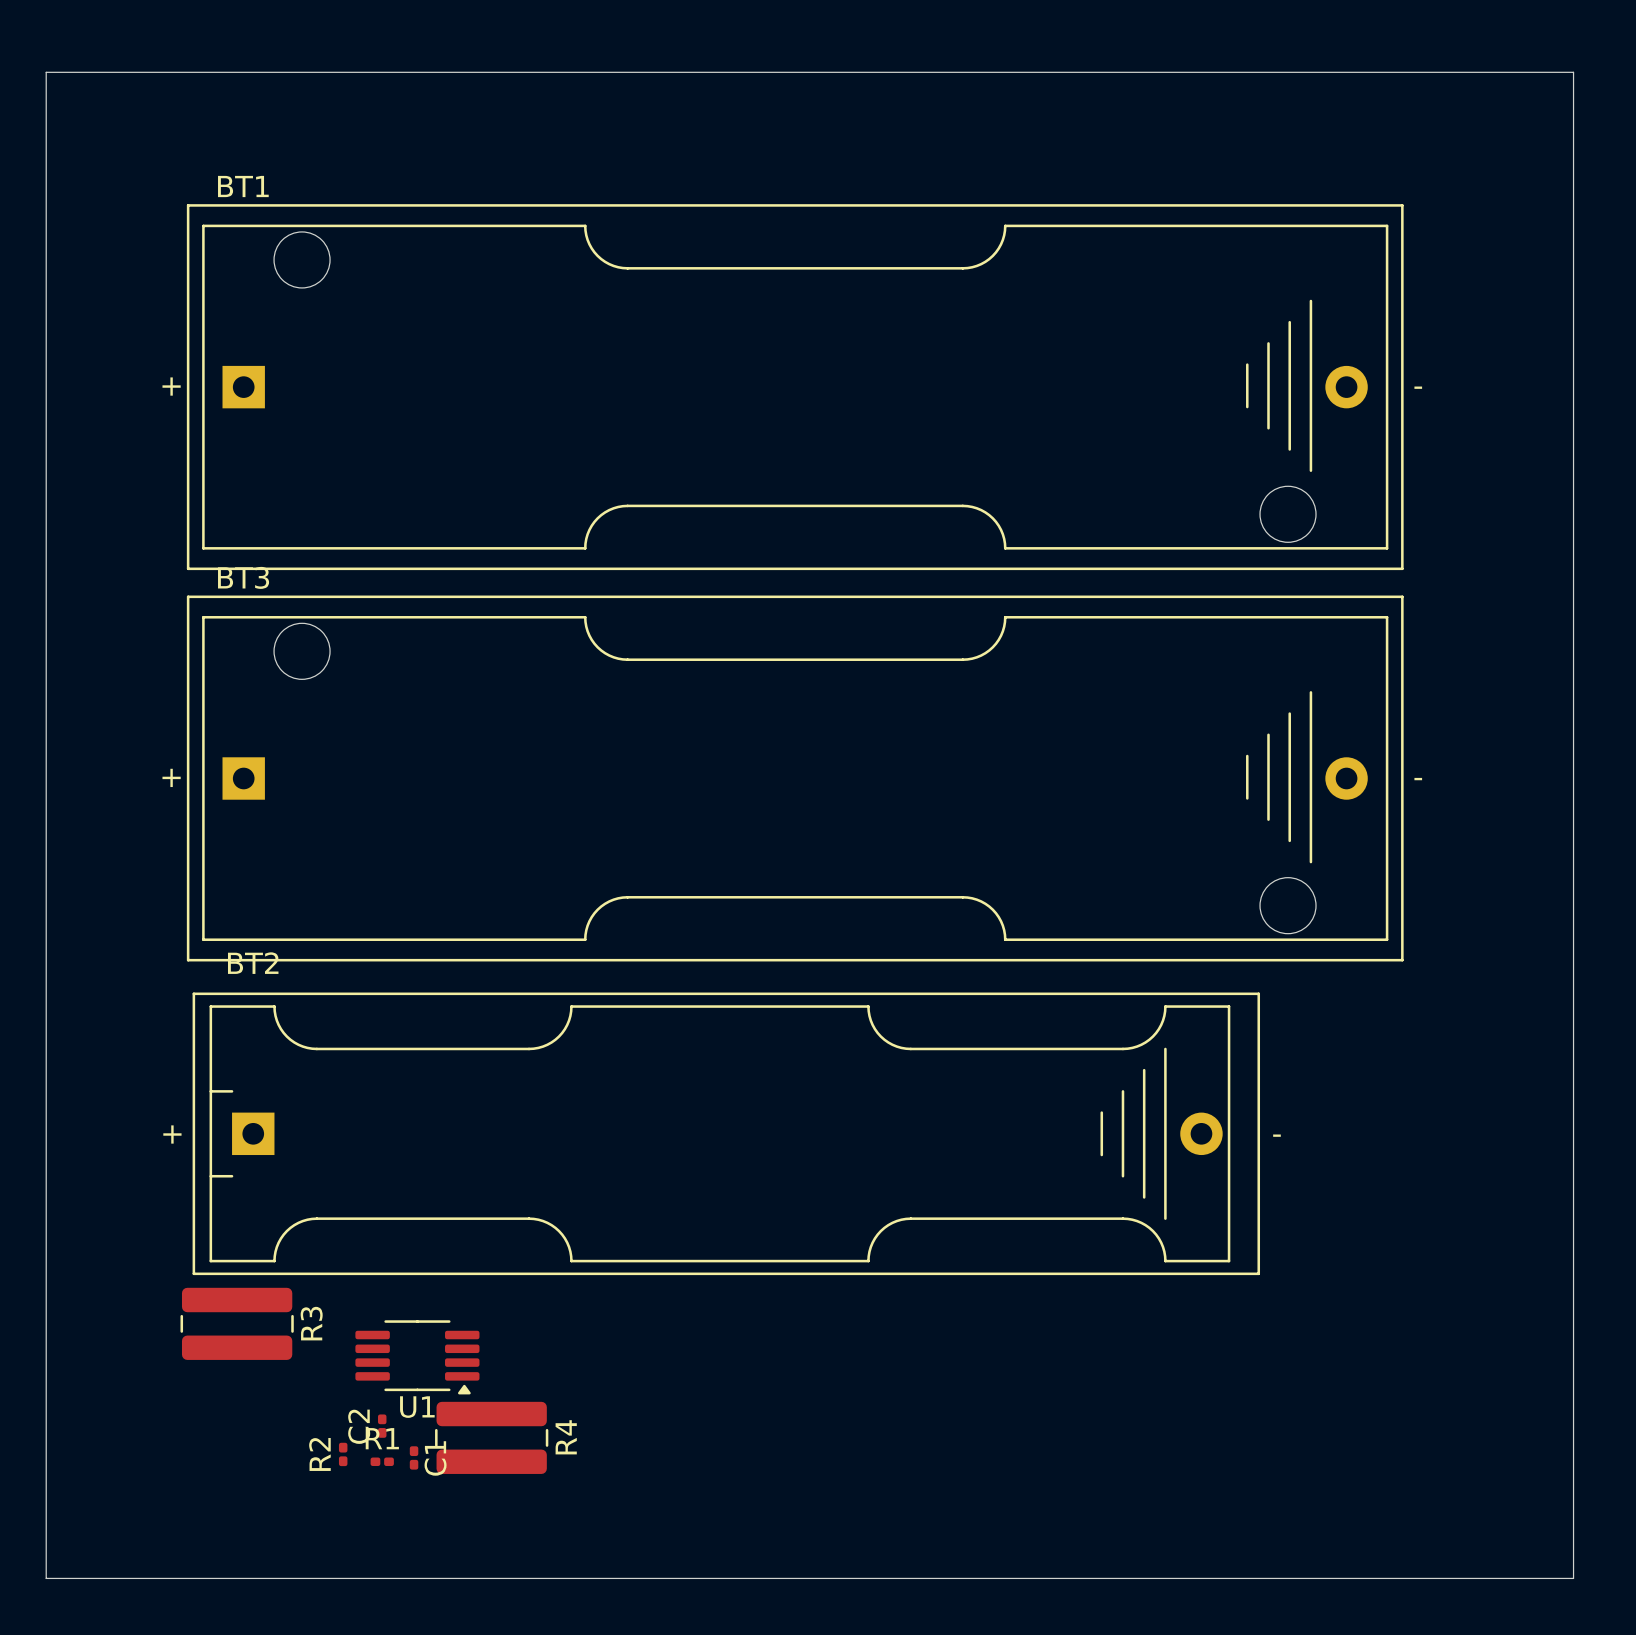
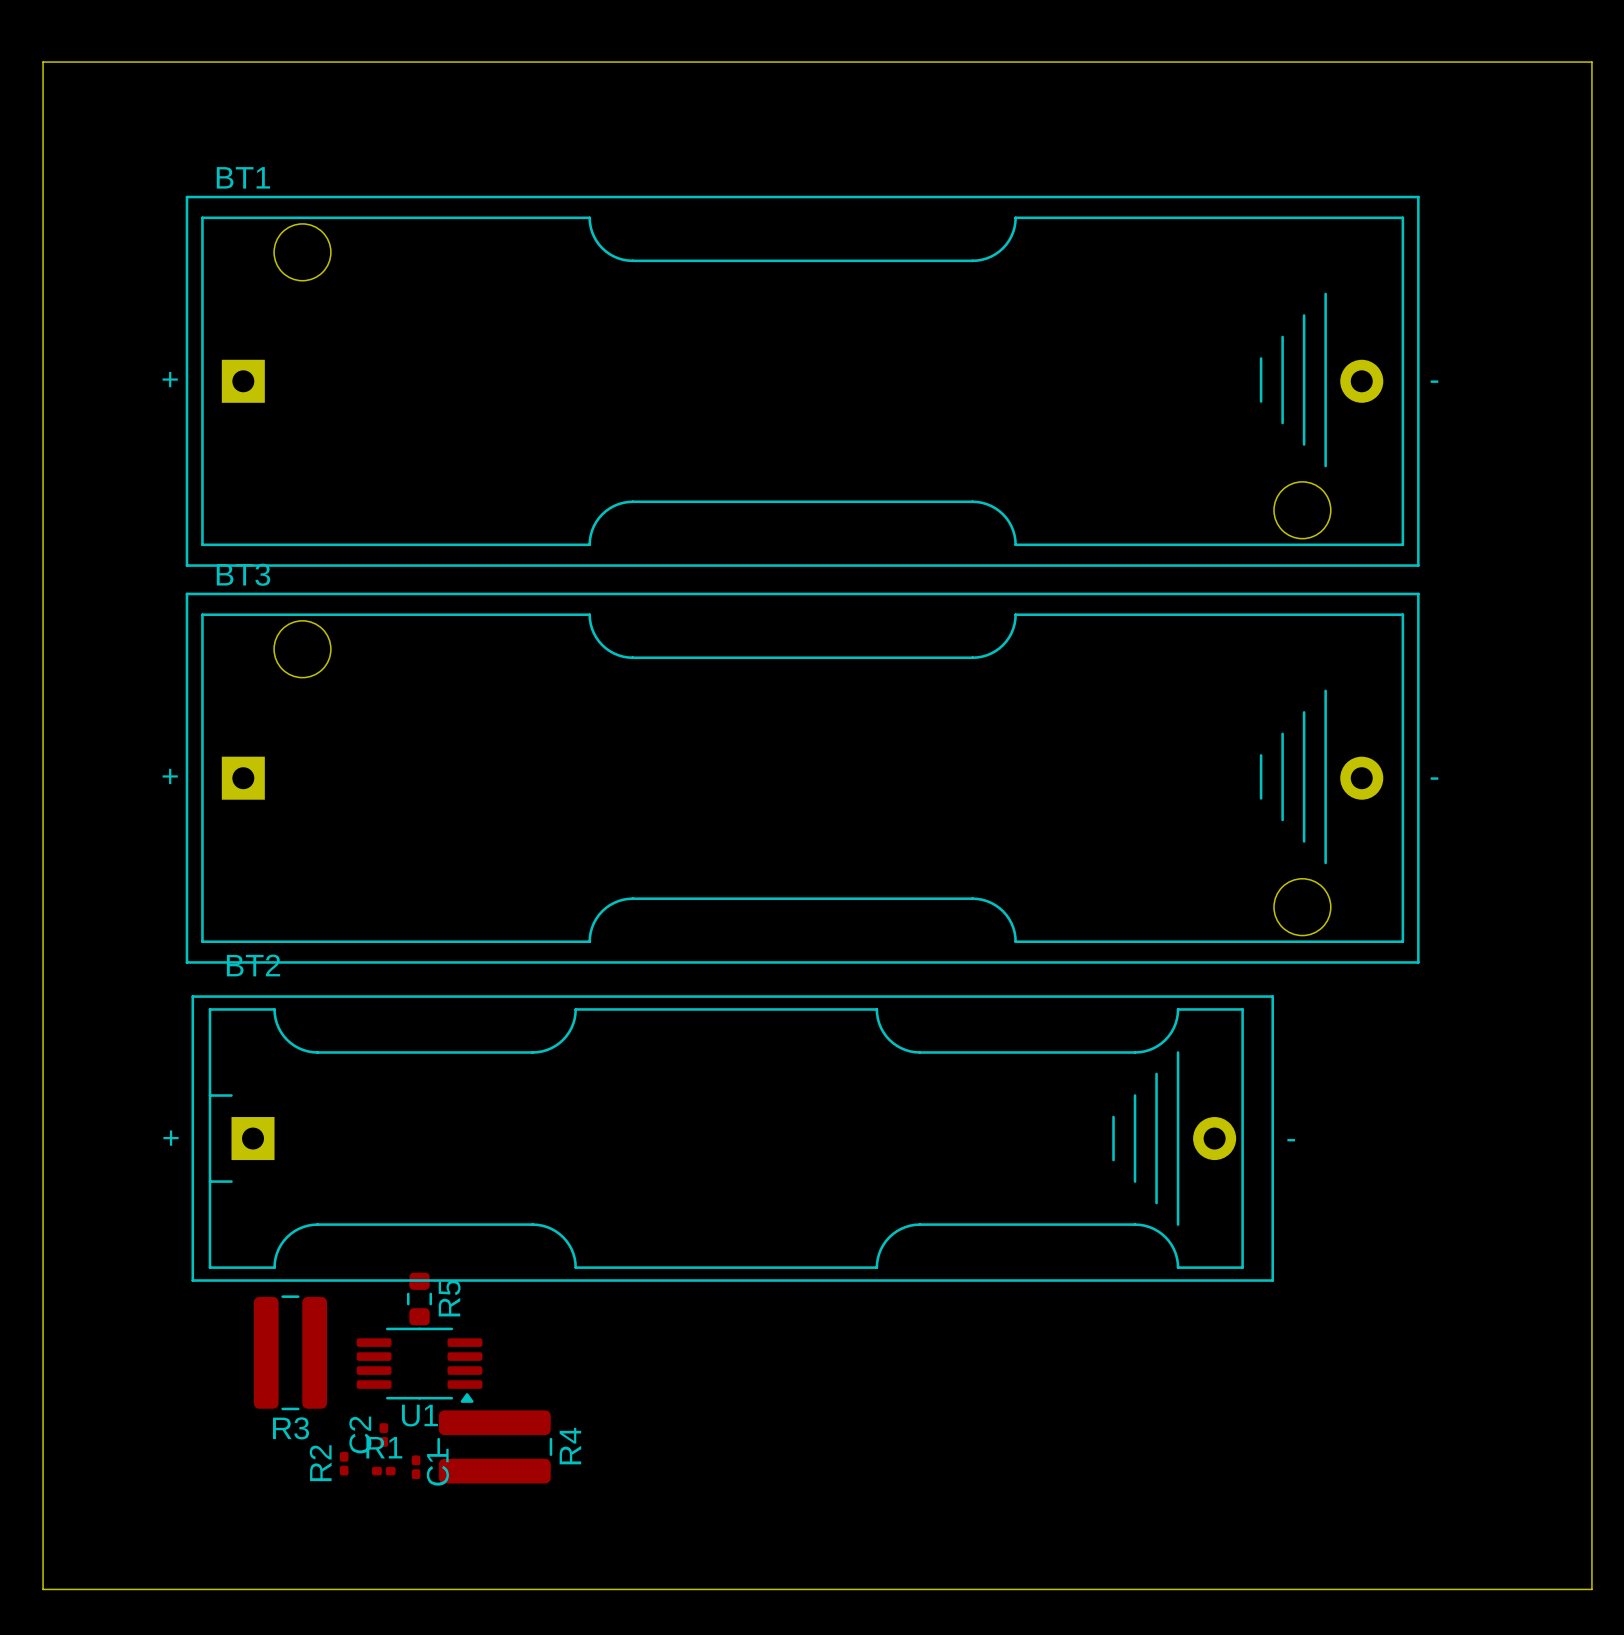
R5: none -> (419, 1299)
R3 rotation: 0° (237, 1323) -> 90° clockwise (290, 1352)

